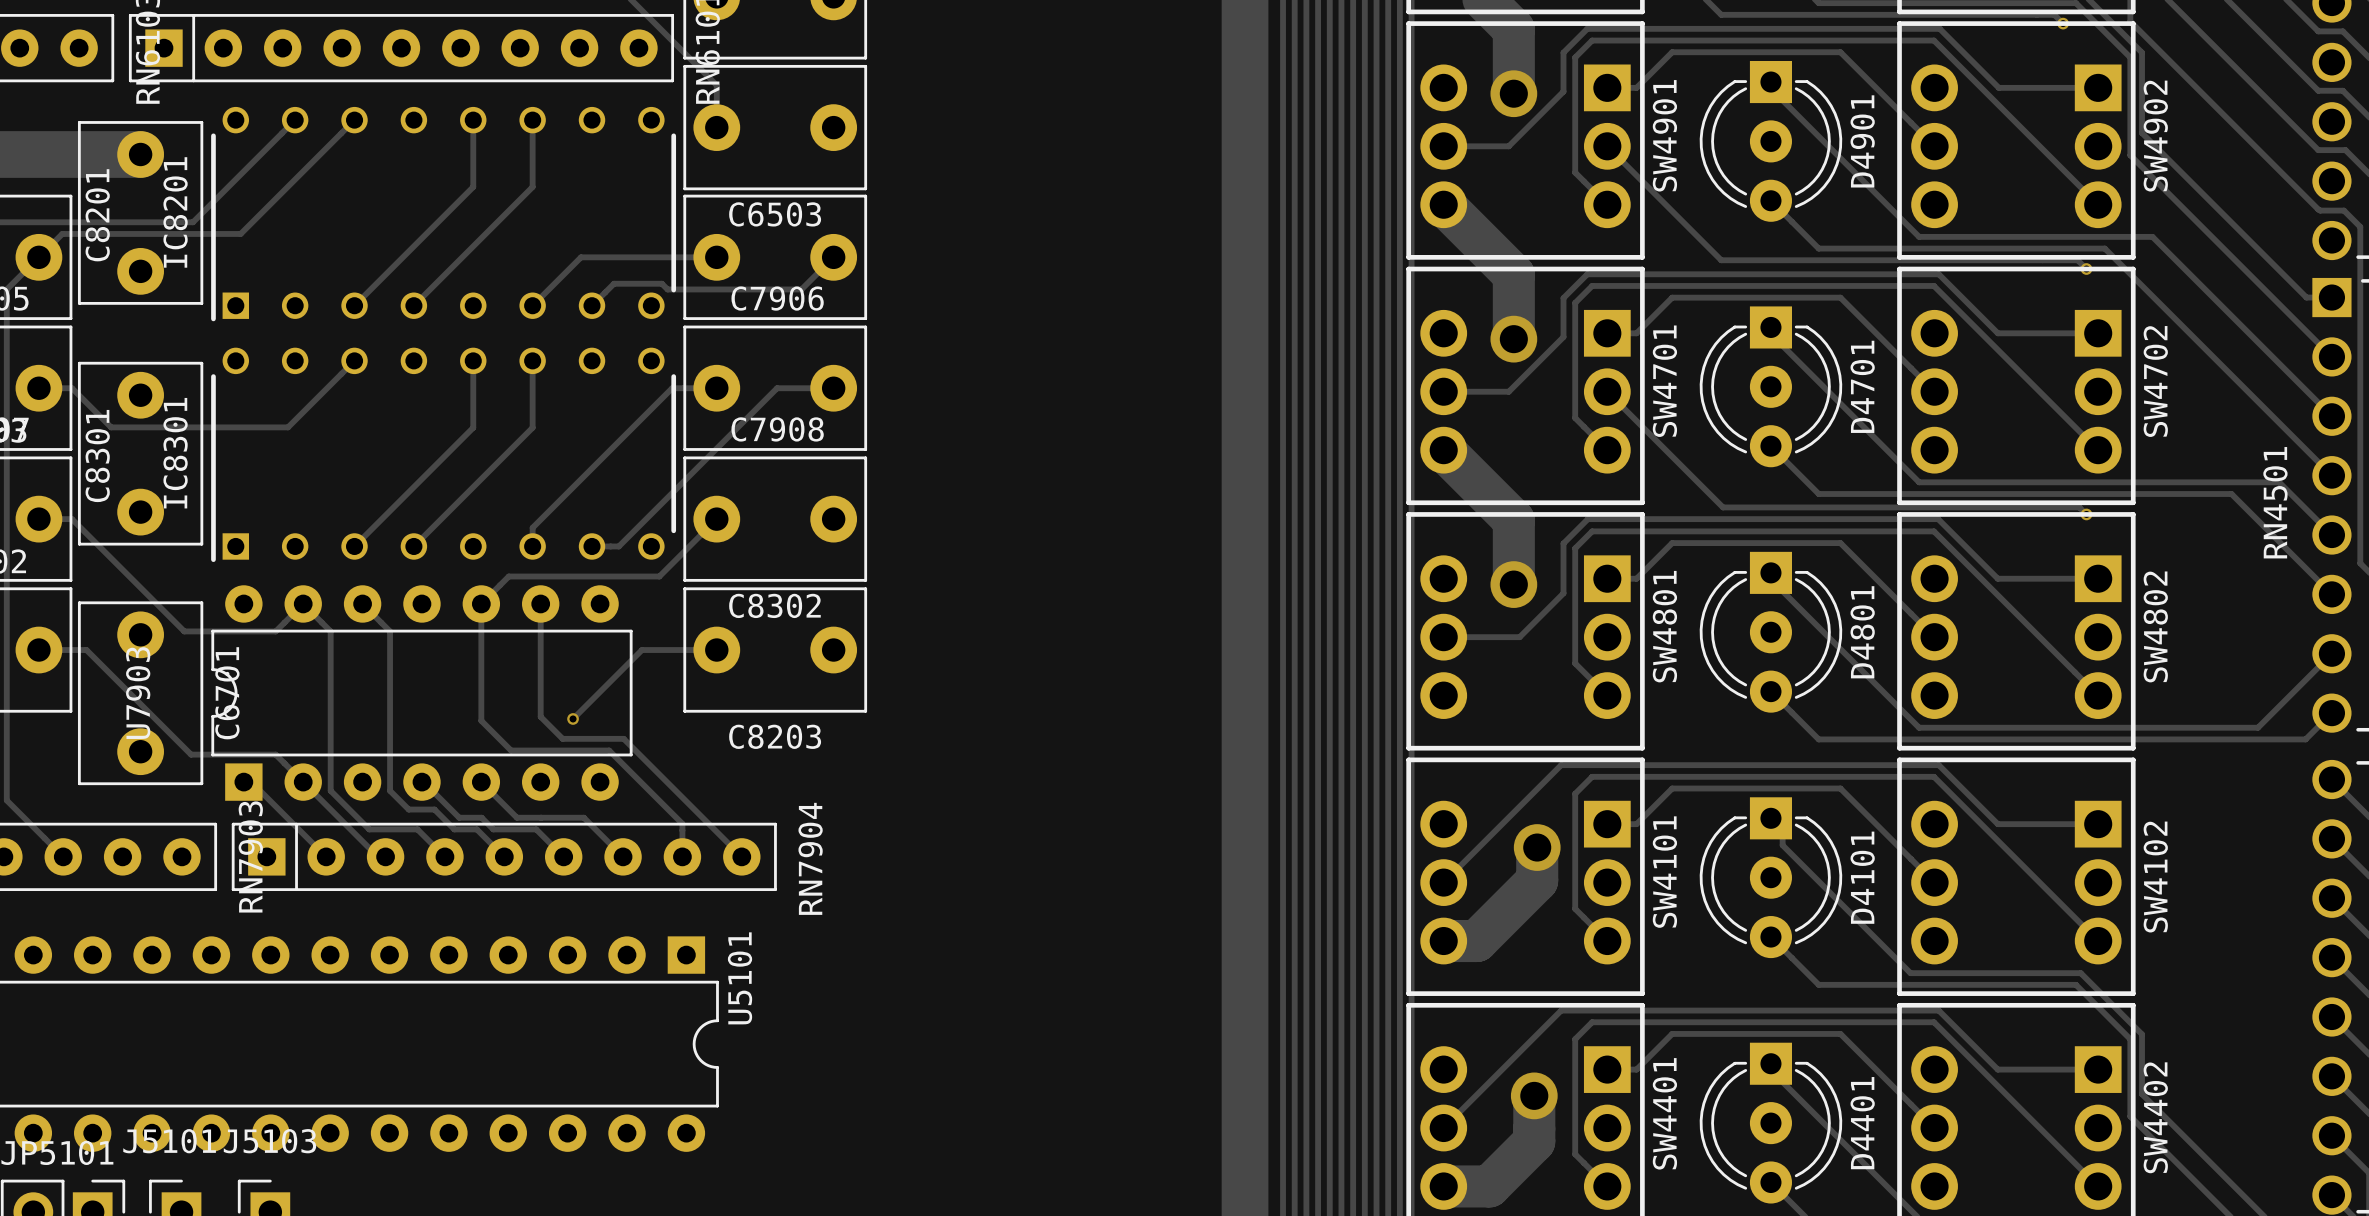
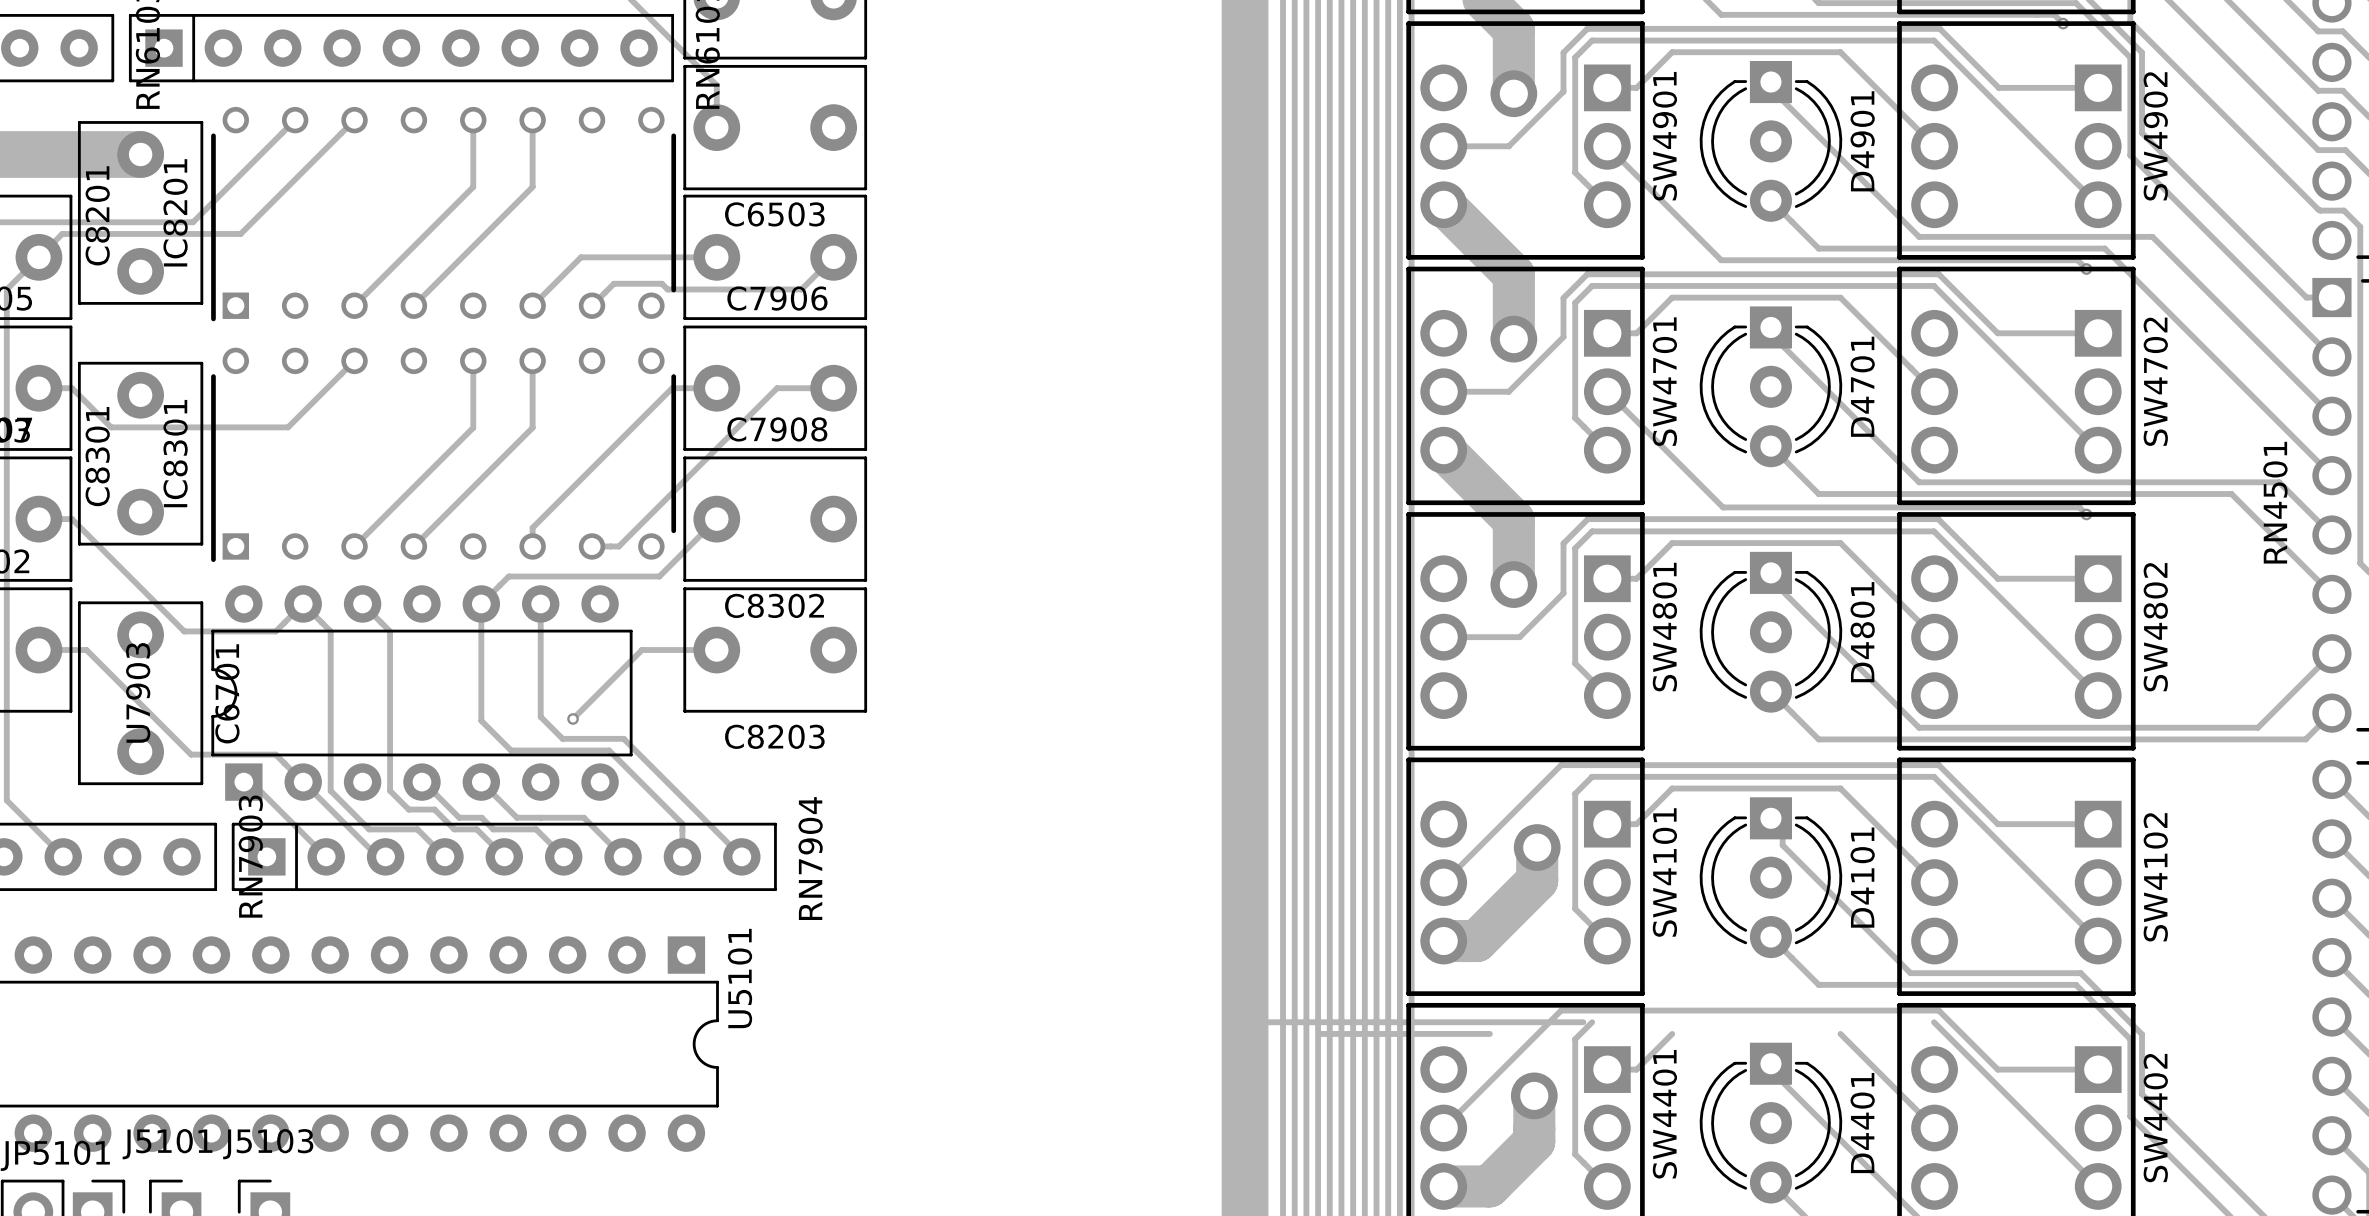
track: (1592, 1022) (1933, 1022) -> (1241, 1022) (1583, 1022)
track: (1672, 1033) (1840, 1033) -> (1321, 1033) (1489, 1033)

